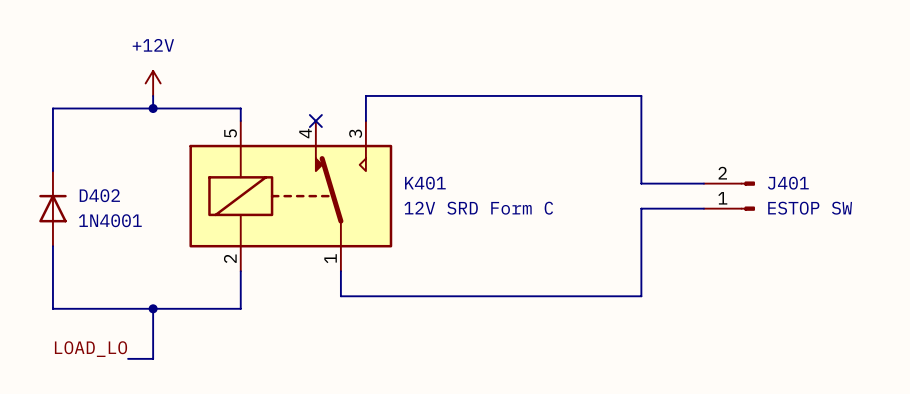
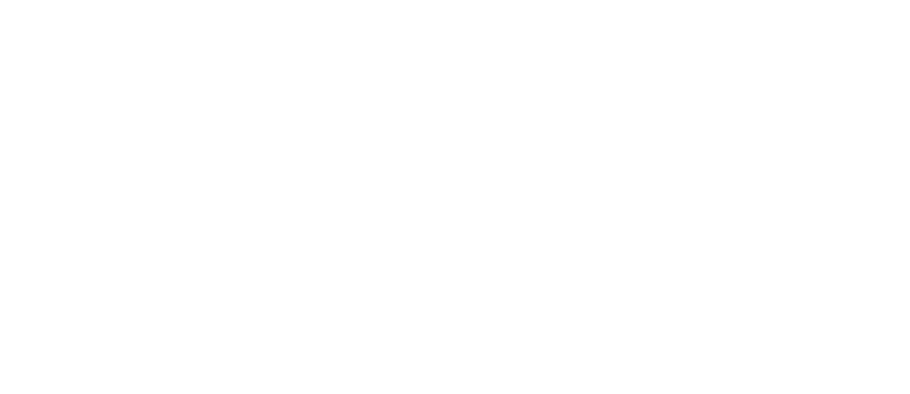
power symbol: +12V (153, 83) -> none
wire: (153, 95) (153, 108) -> none
junction: (153, 108) -> none
wire: (240, 121) (240, 108) (52, 108) (52, 171) -> none
no-connect mark: (315, 121) -> none
wire: (365, 121) (365, 95) (641, 95) (641, 183) (703, 183) -> none
K401: 12V SRD Form C (290, 196) -> none
J401: ESTOP SW (729, 196) -> none
D402: 1N4001 (52, 208) -> none
wire: (703, 208) (641, 208) (641, 296) (340, 296) (340, 271) -> none
wire: (52, 246) (52, 308) (240, 308) (240, 271) -> none
wire: (153, 308) (153, 358) (128, 358) -> none
junction: (153, 308) -> none
label: LOAD_LO (91, 349) -> none

